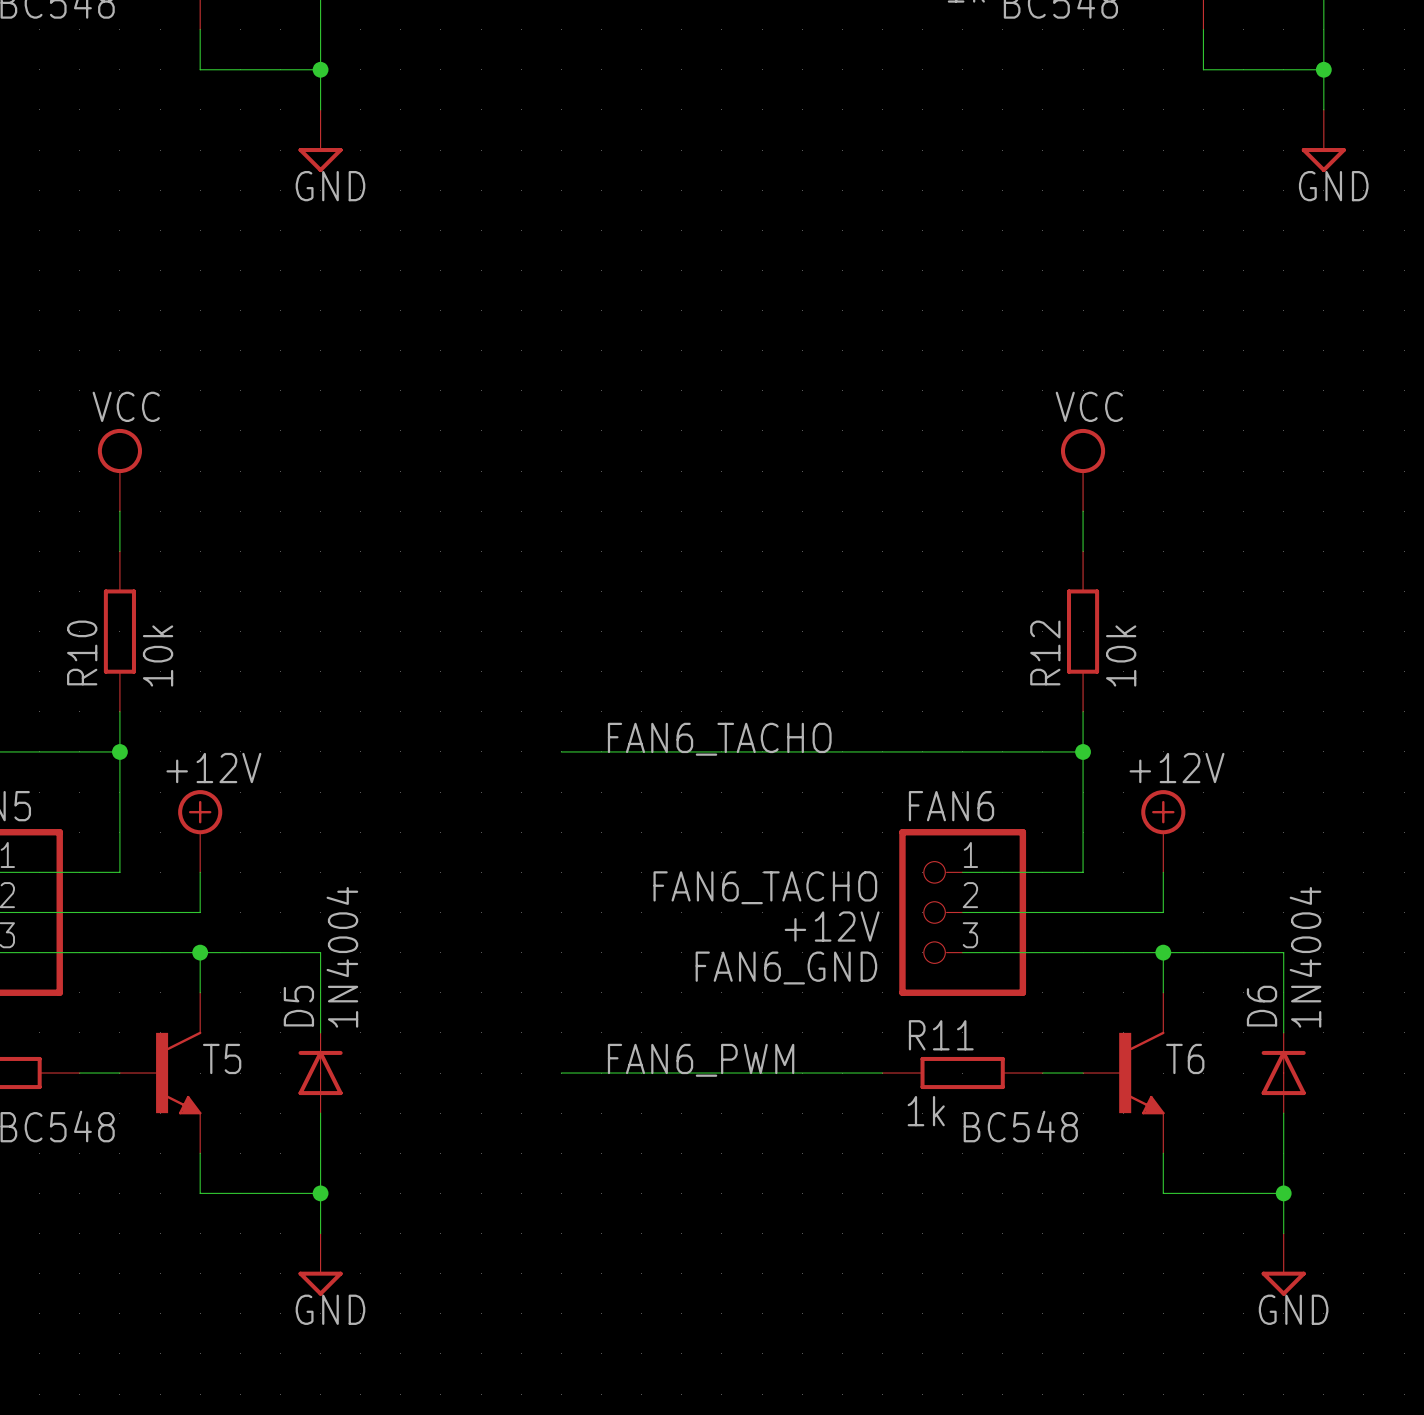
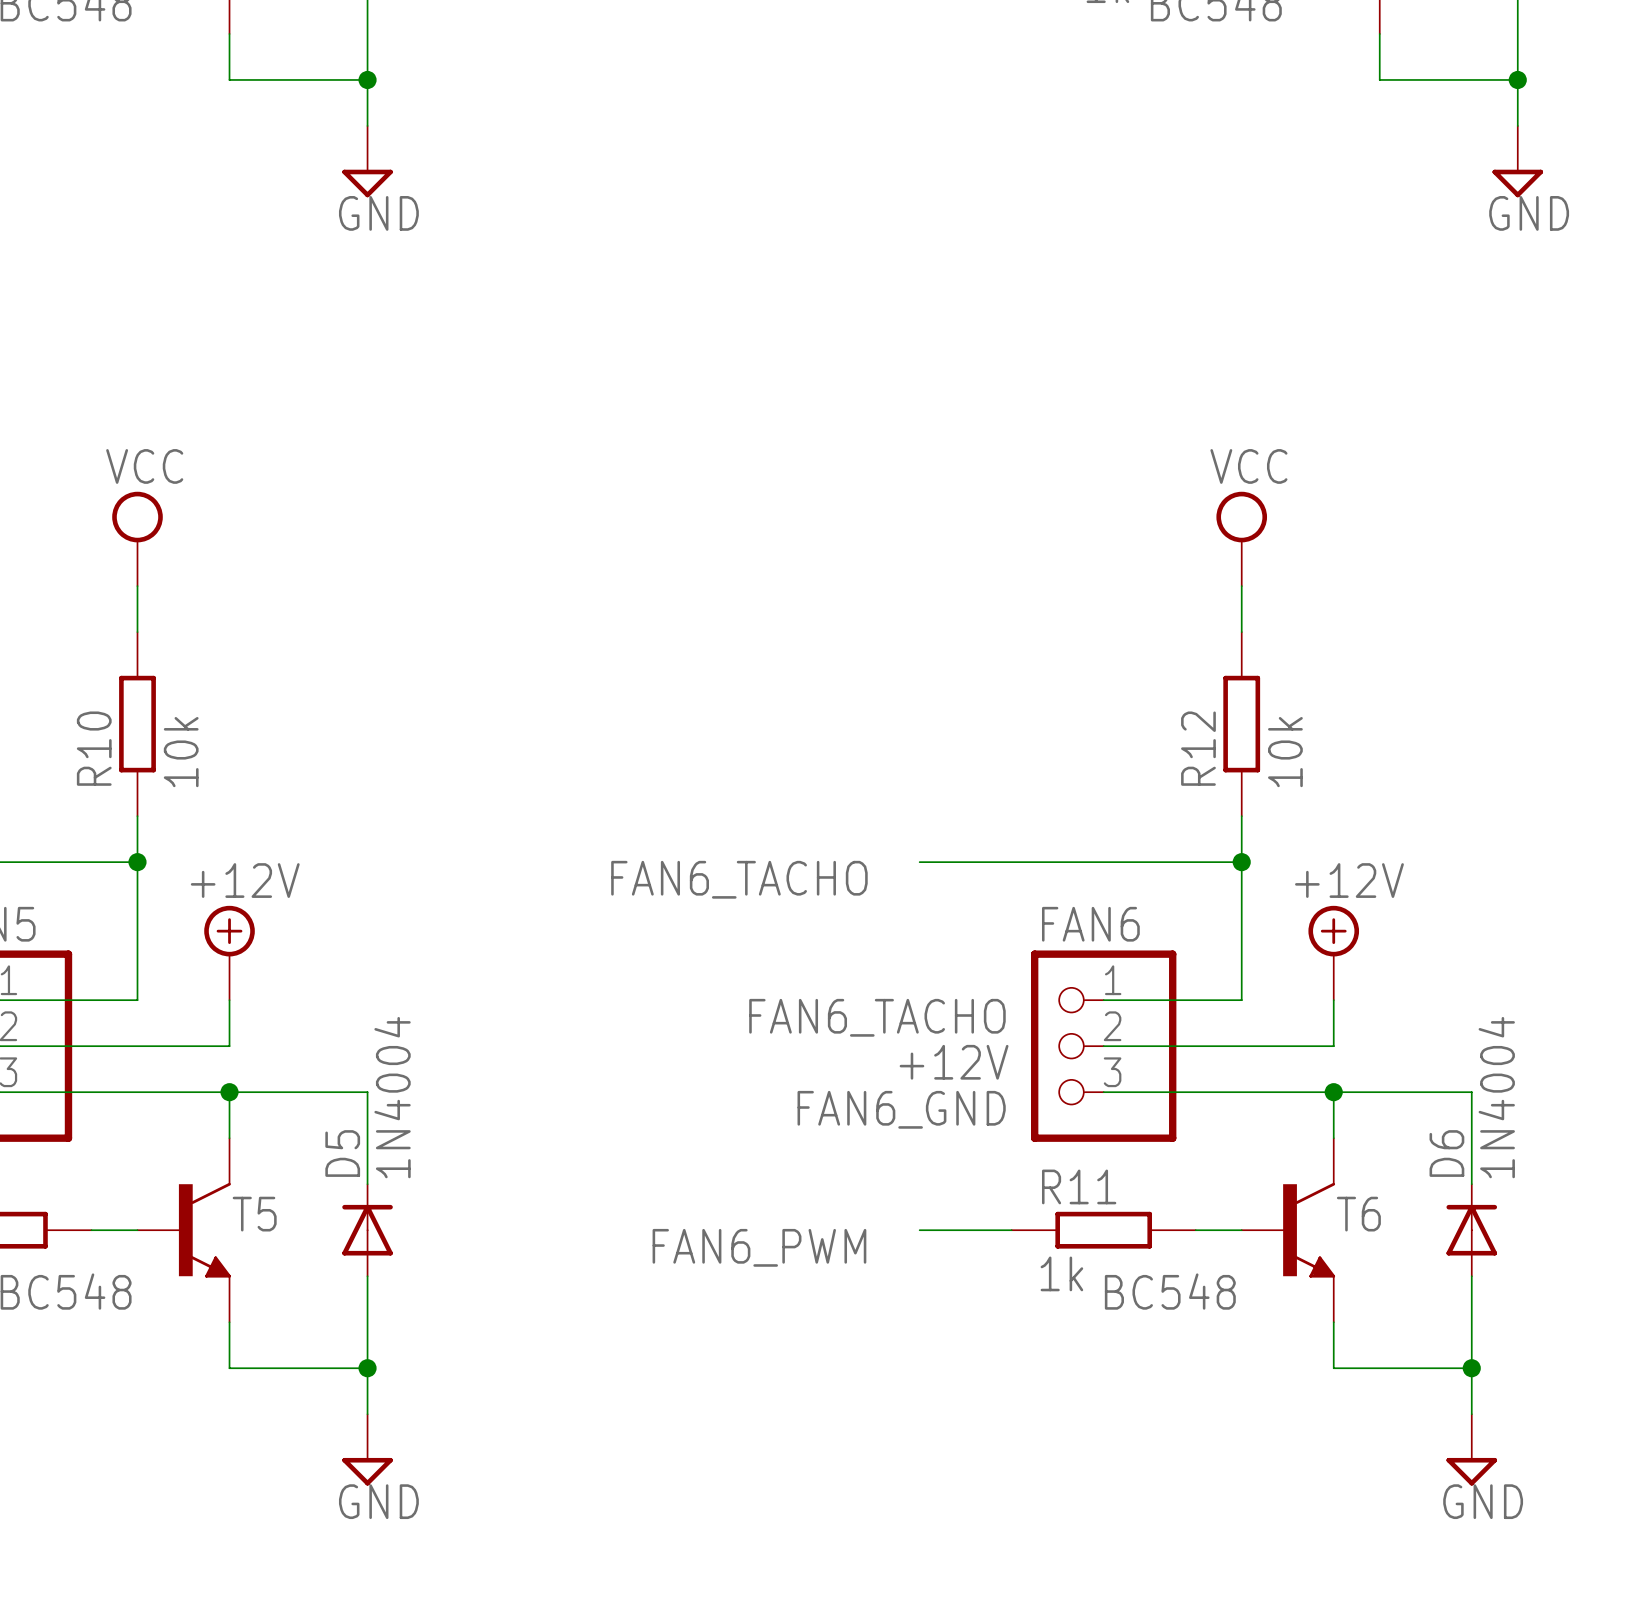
label position: FAN6_TACHO (719, 739) -> FAN6_TACHO (739, 879)
wire: (561, 751) (802, 751) -> none
label position: FAN6_PWM (701, 1060) -> FAN6_PWM (759, 1247)
wire: (561, 1073) (802, 1073) -> none

